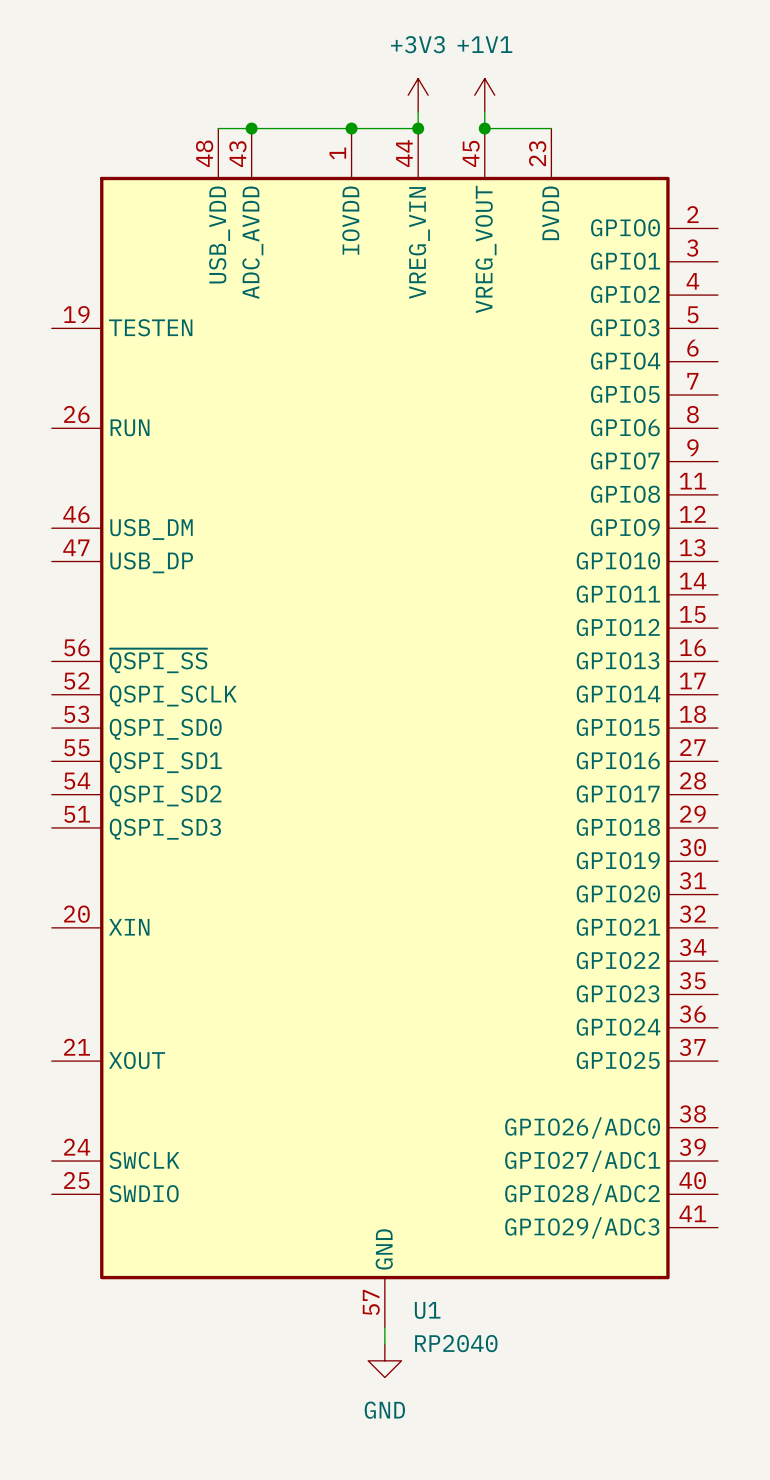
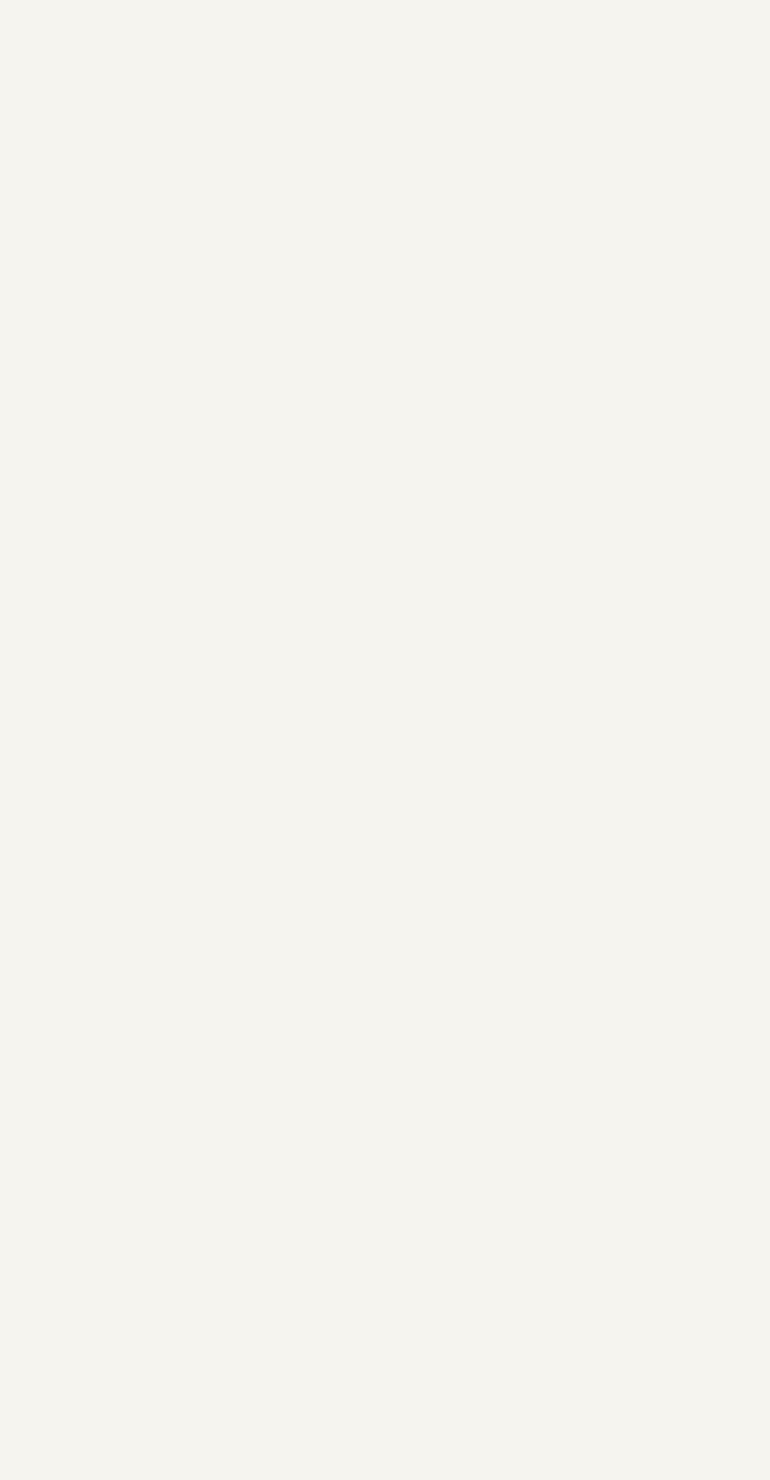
power symbol: +3V3 (418, 95) -> none
power symbol: +1V1 (484, 95) -> none
wire: (418, 111) (418, 128) (218, 128) -> none
wire: (484, 111) (484, 128) (551, 128) -> none
junction: (251, 128) -> none
junction: (351, 128) -> none
junction: (418, 128) -> none
junction: (484, 128) -> none
U1: RP2040 (384, 728) -> none
wire: (384, 1327) (384, 1344) -> none
power symbol: GND (384, 1360) -> none

